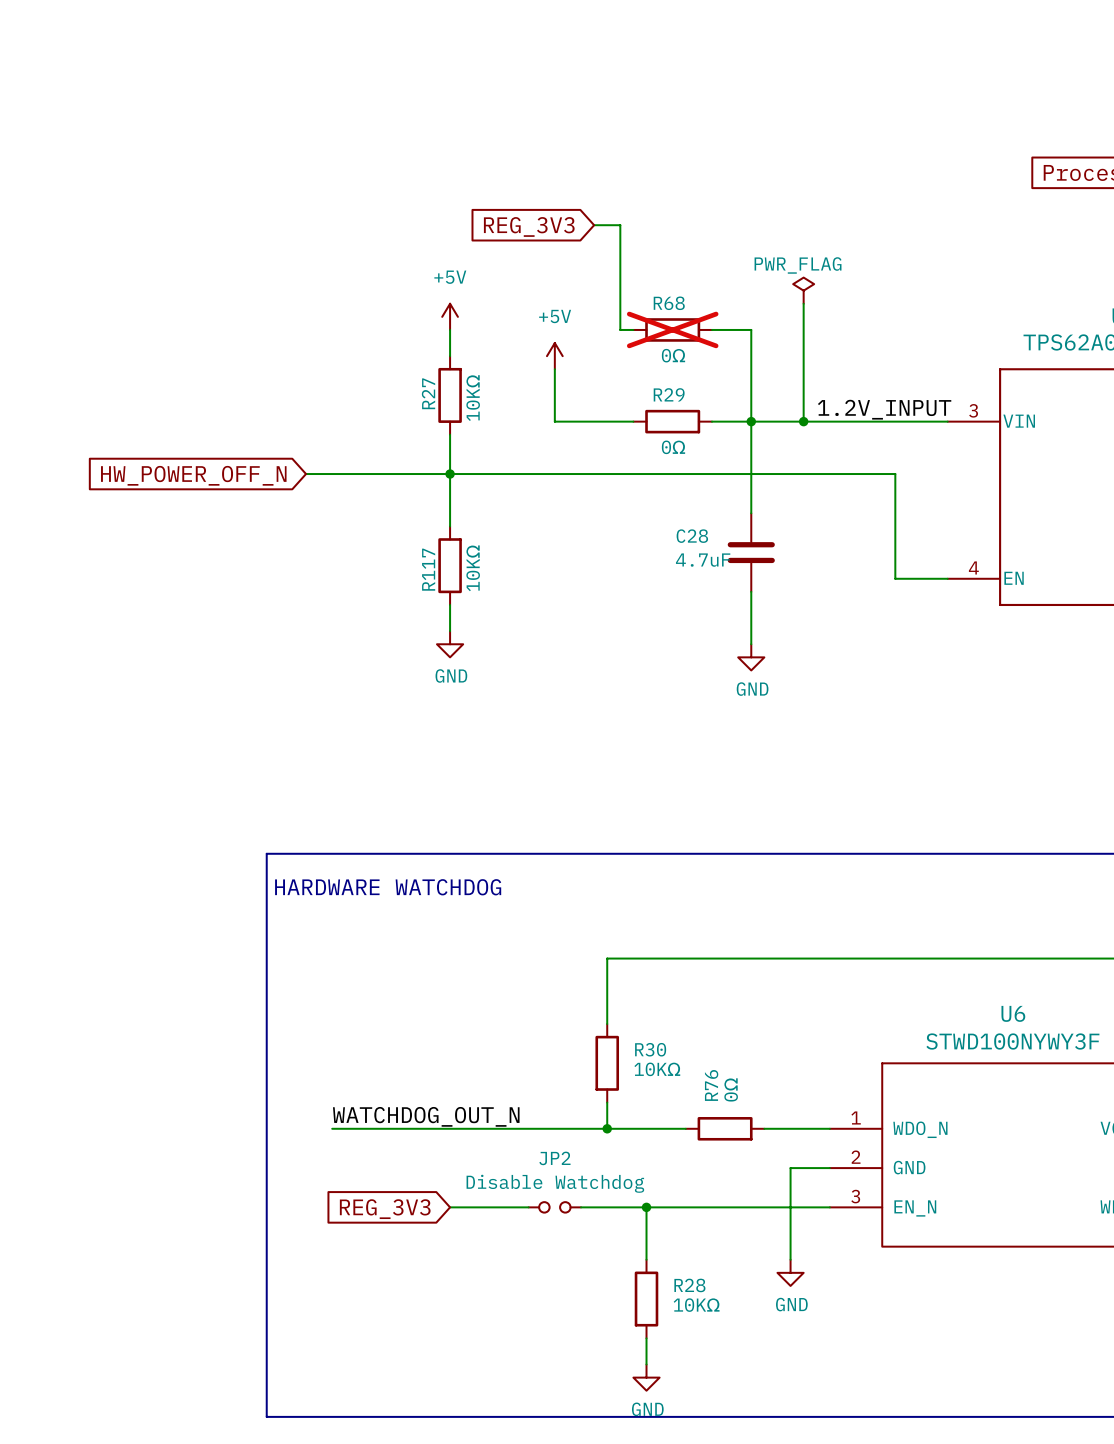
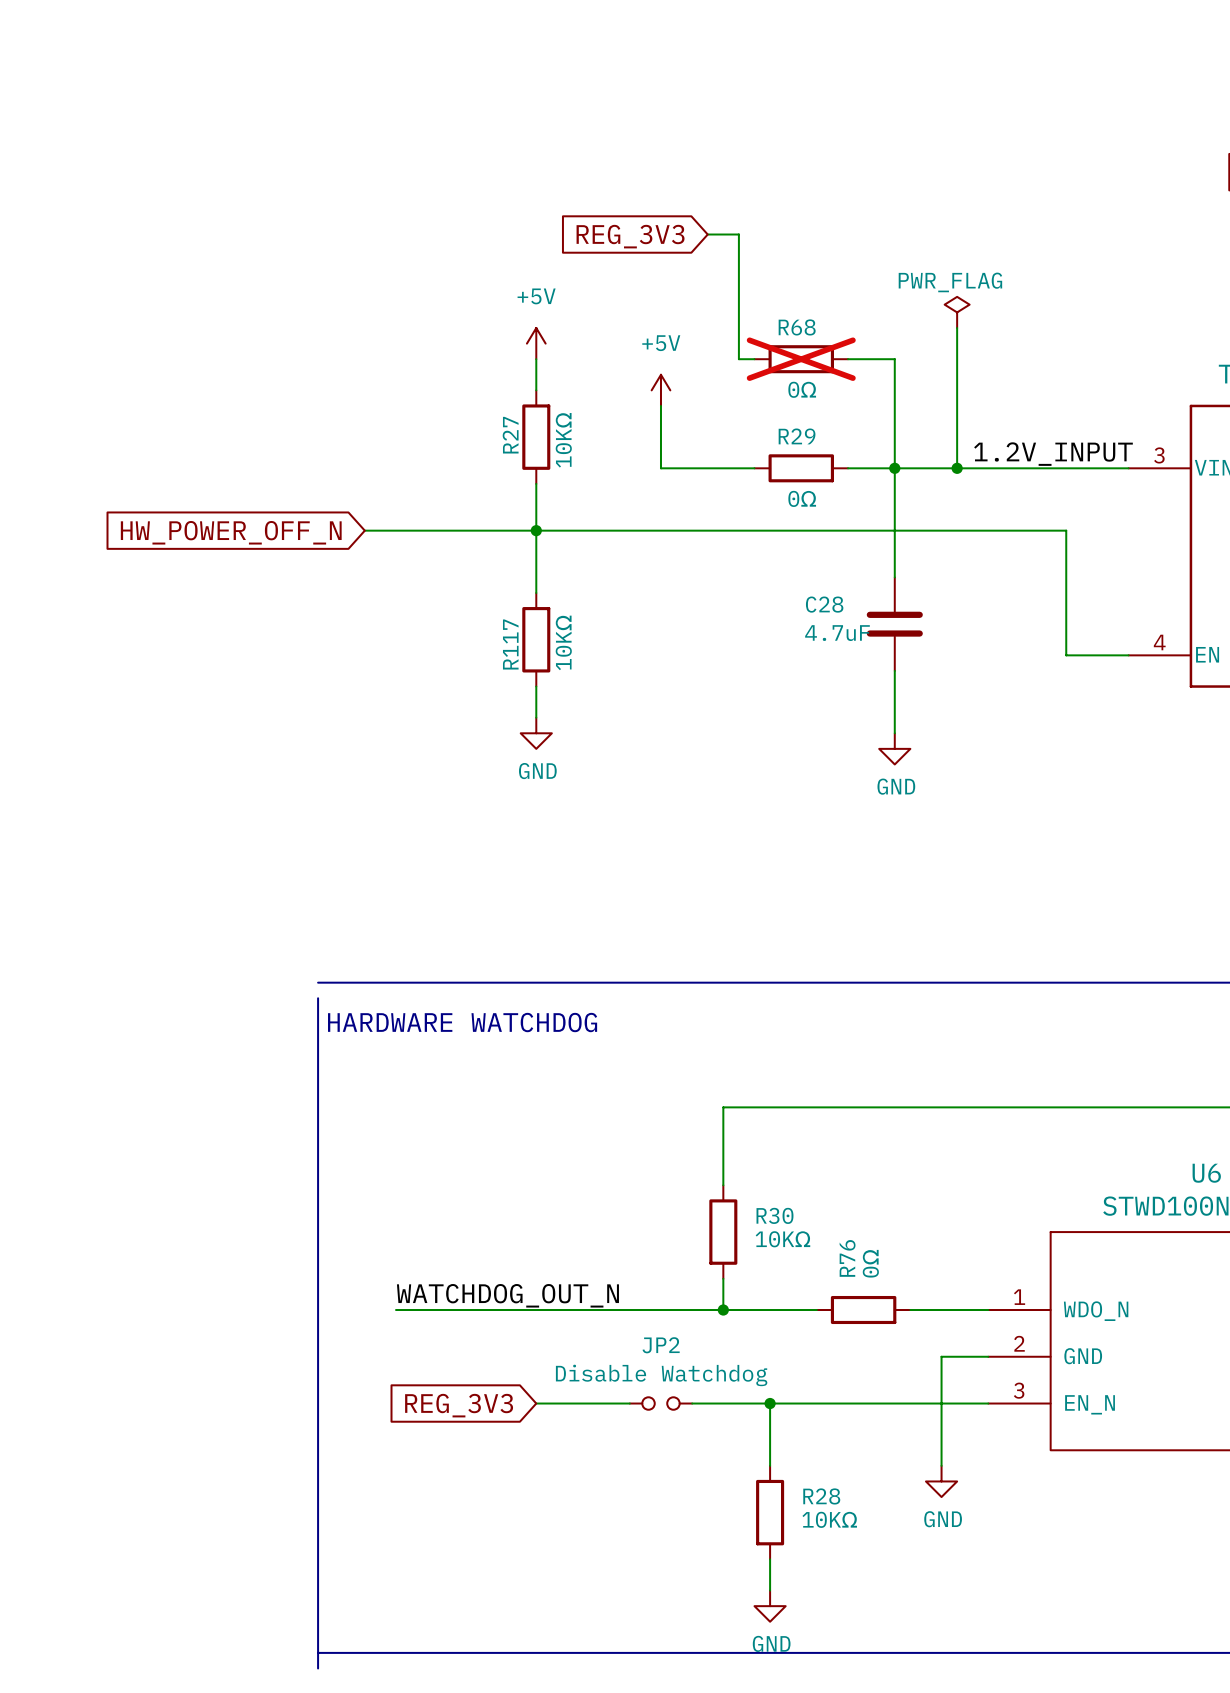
line: (266, 853) (266, 866) -> none
line: none -> (318, 1652) (318, 1668)

